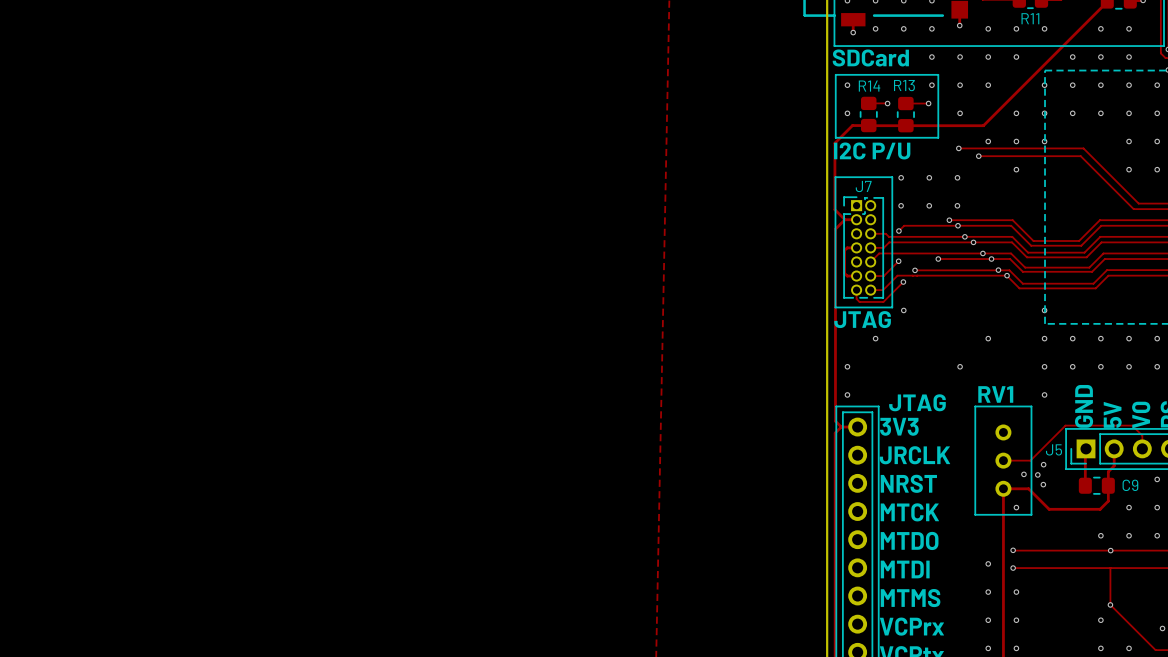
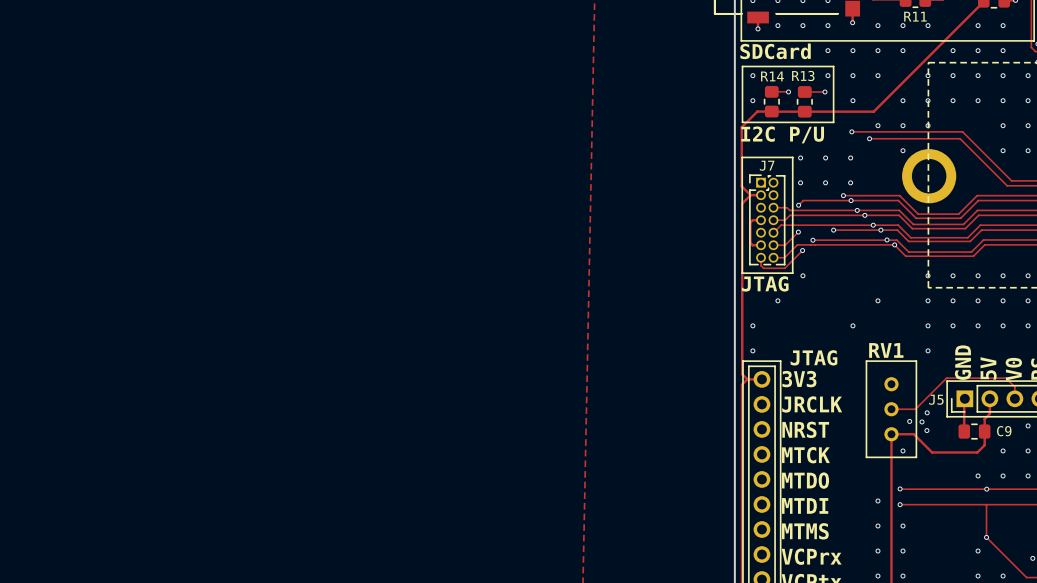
part: none -> (929, 176)
via: none -> (953, 275)
via: none -> (978, 275)
via: none -> (1003, 275)
via: none -> (1028, 275)

